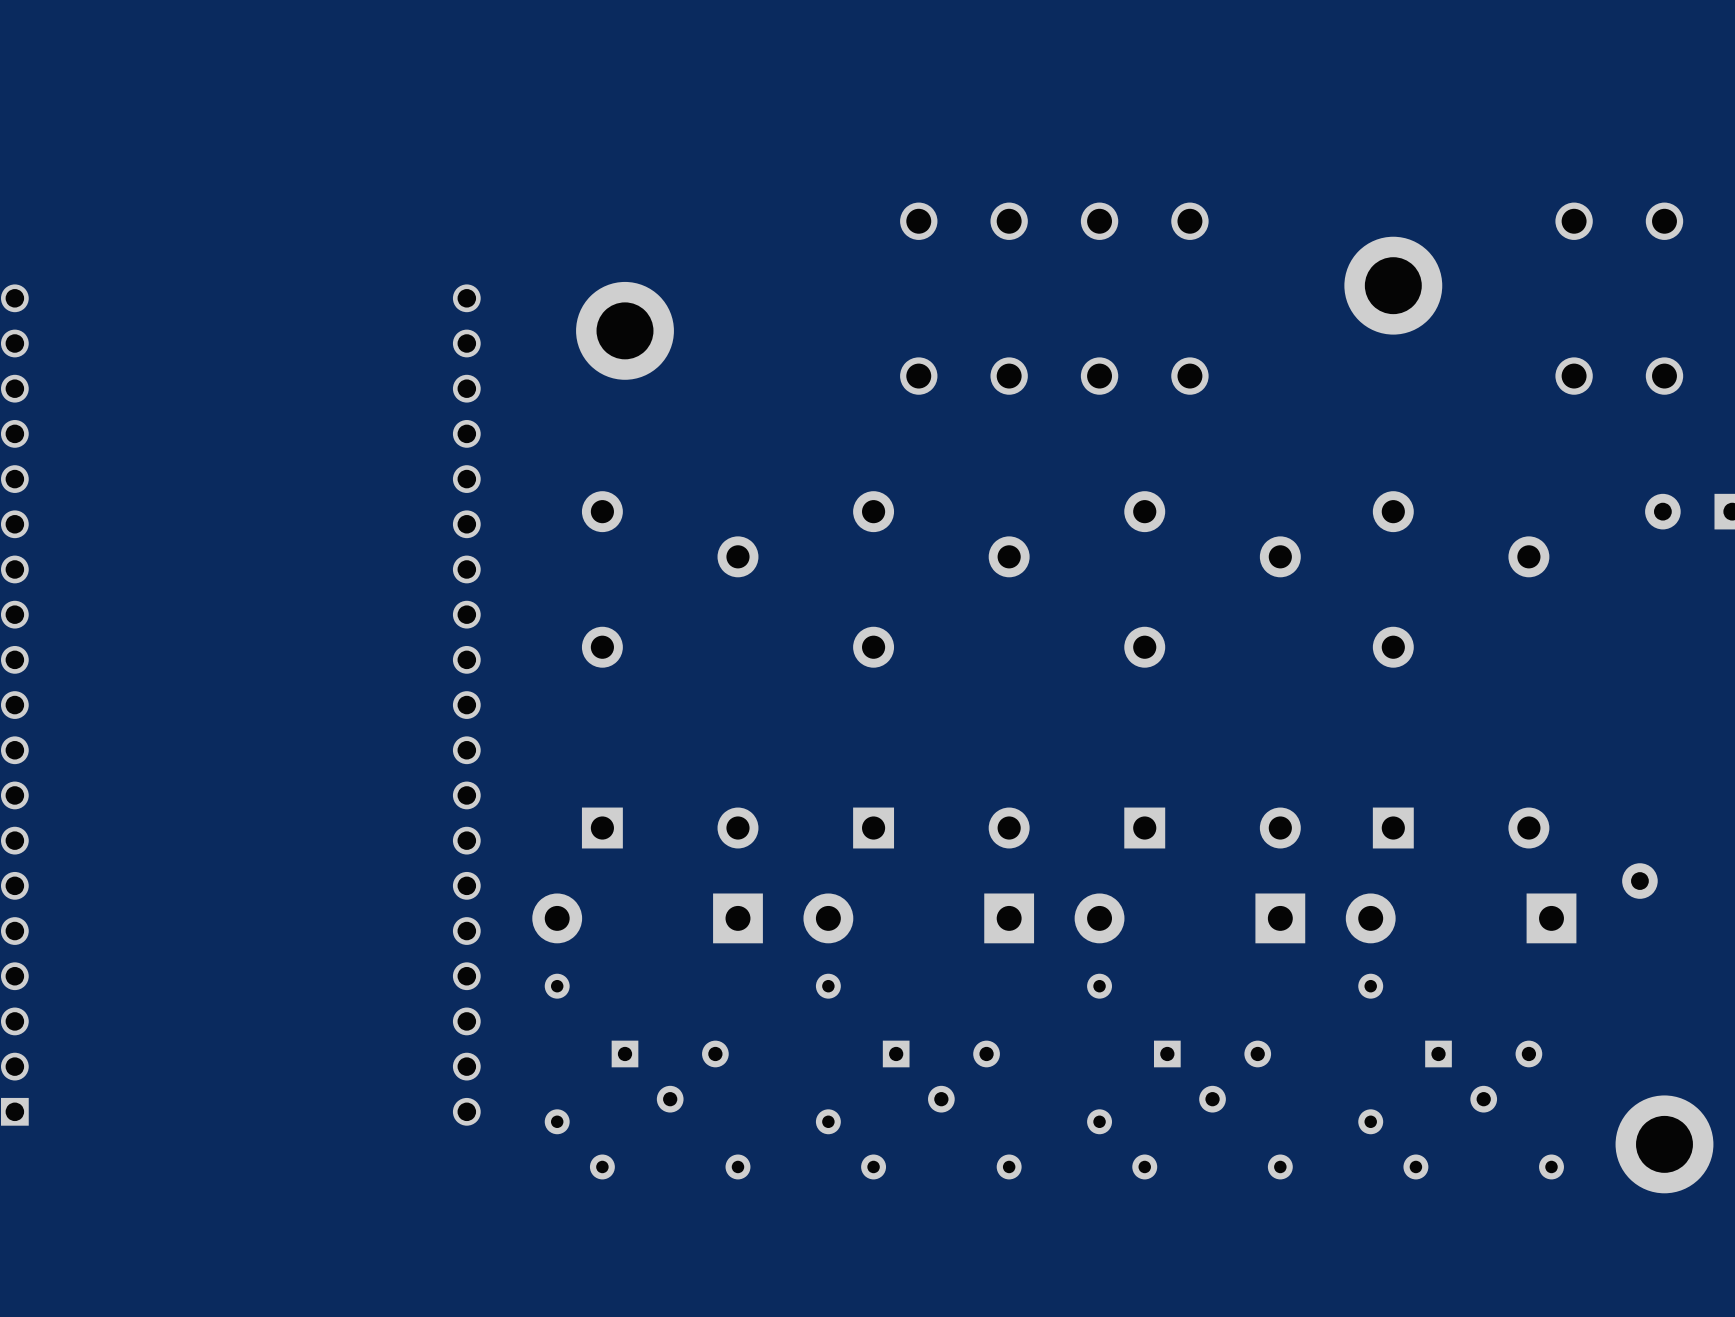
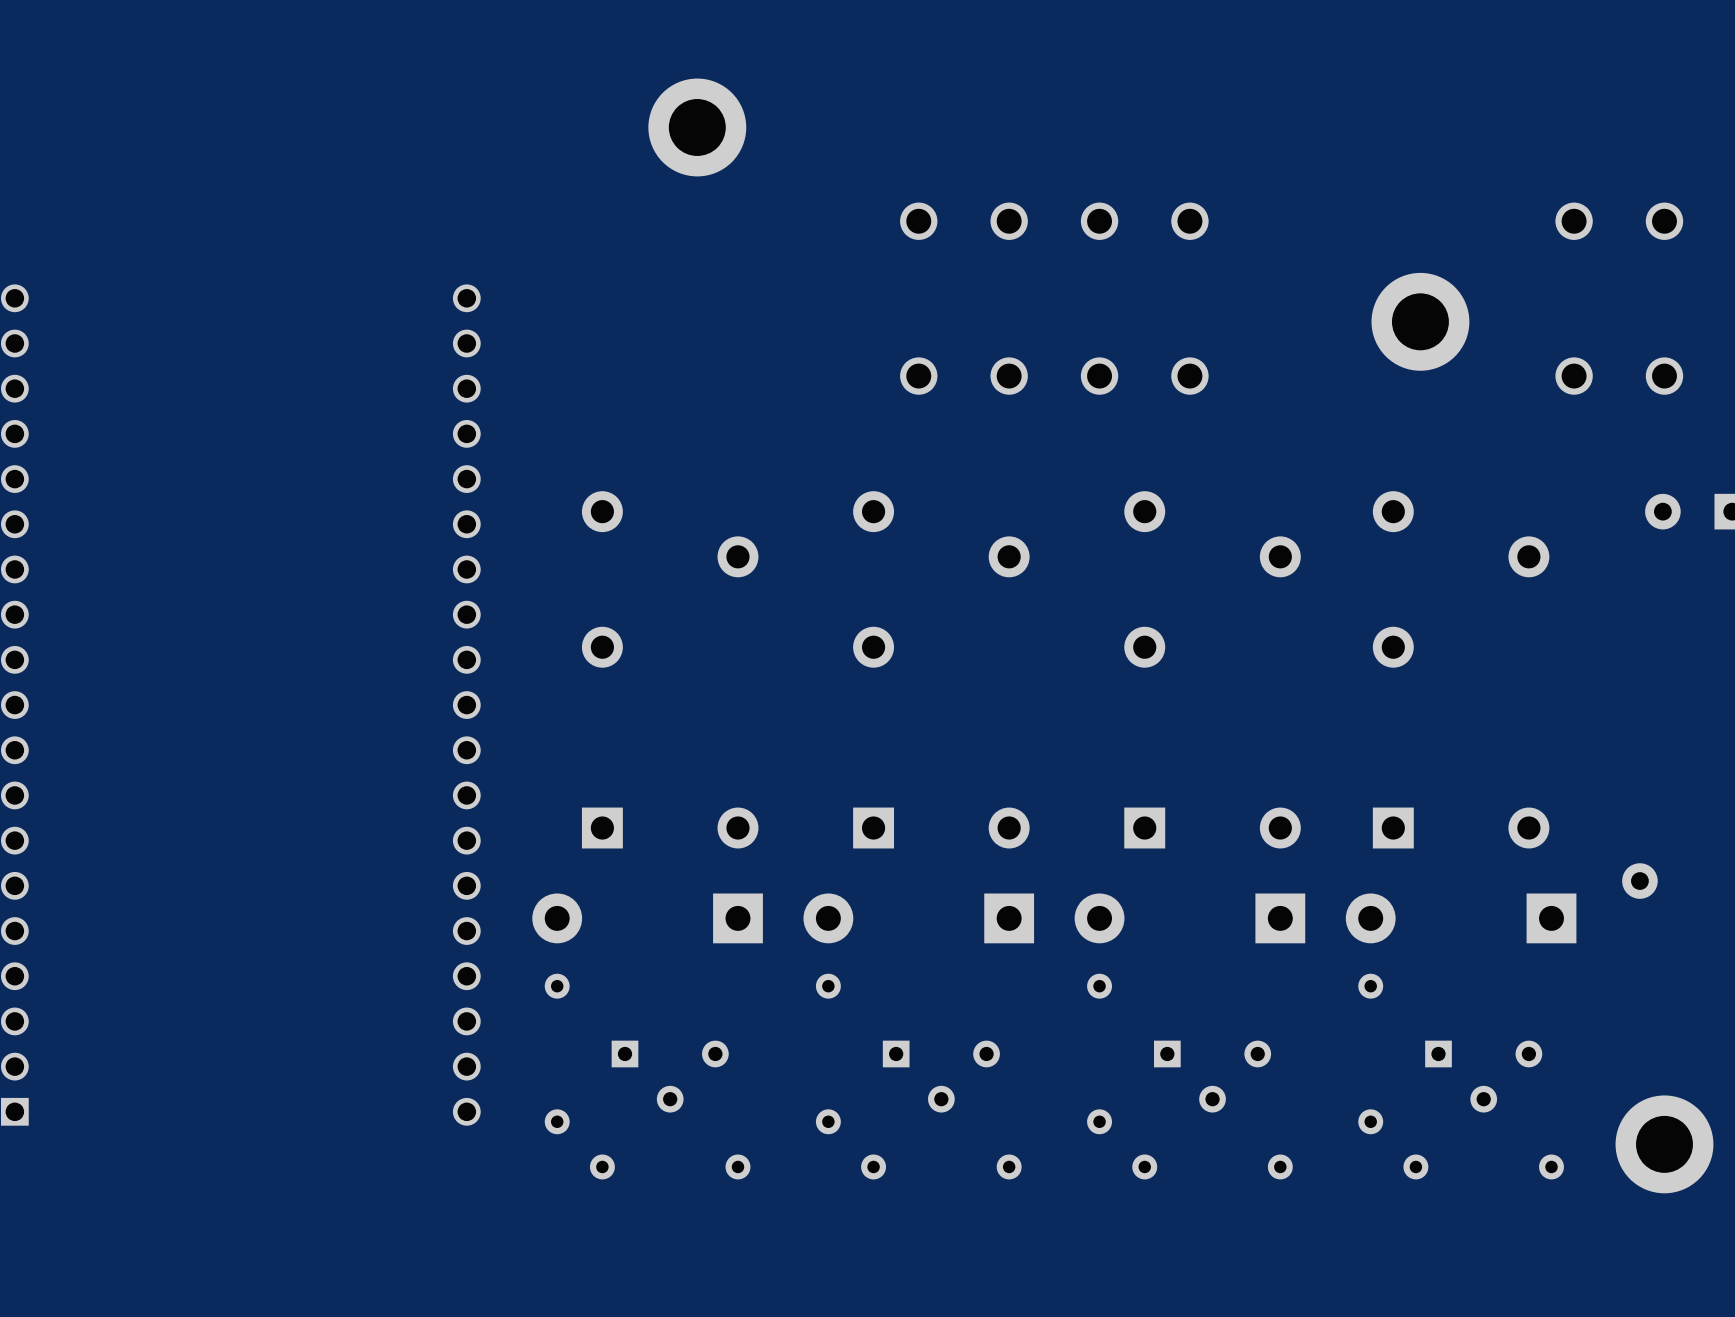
part position: (1393, 285) -> (1420, 321)
part position: (625, 330) -> (697, 127)

